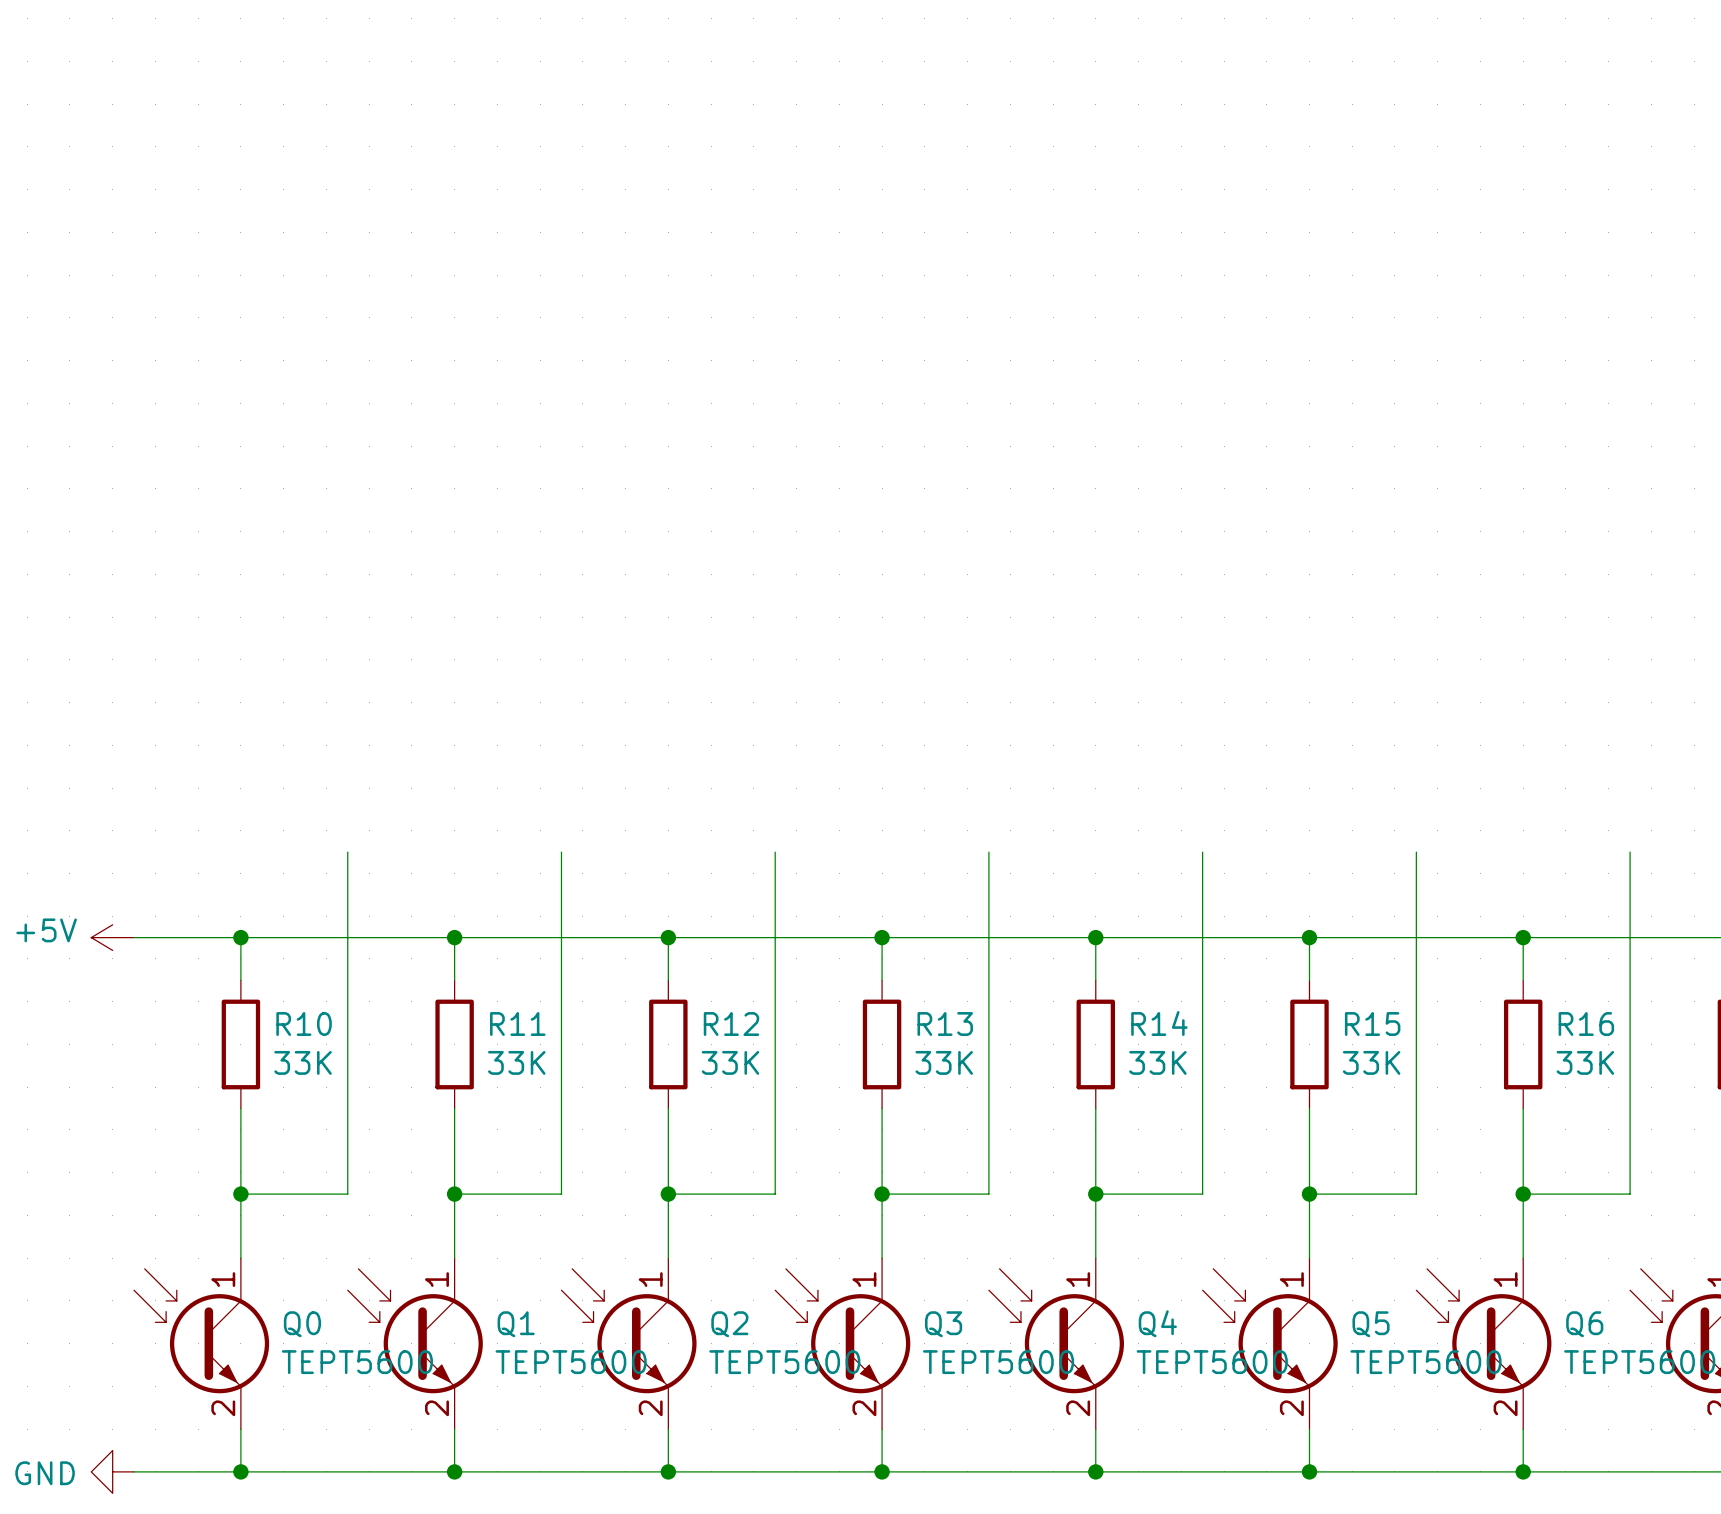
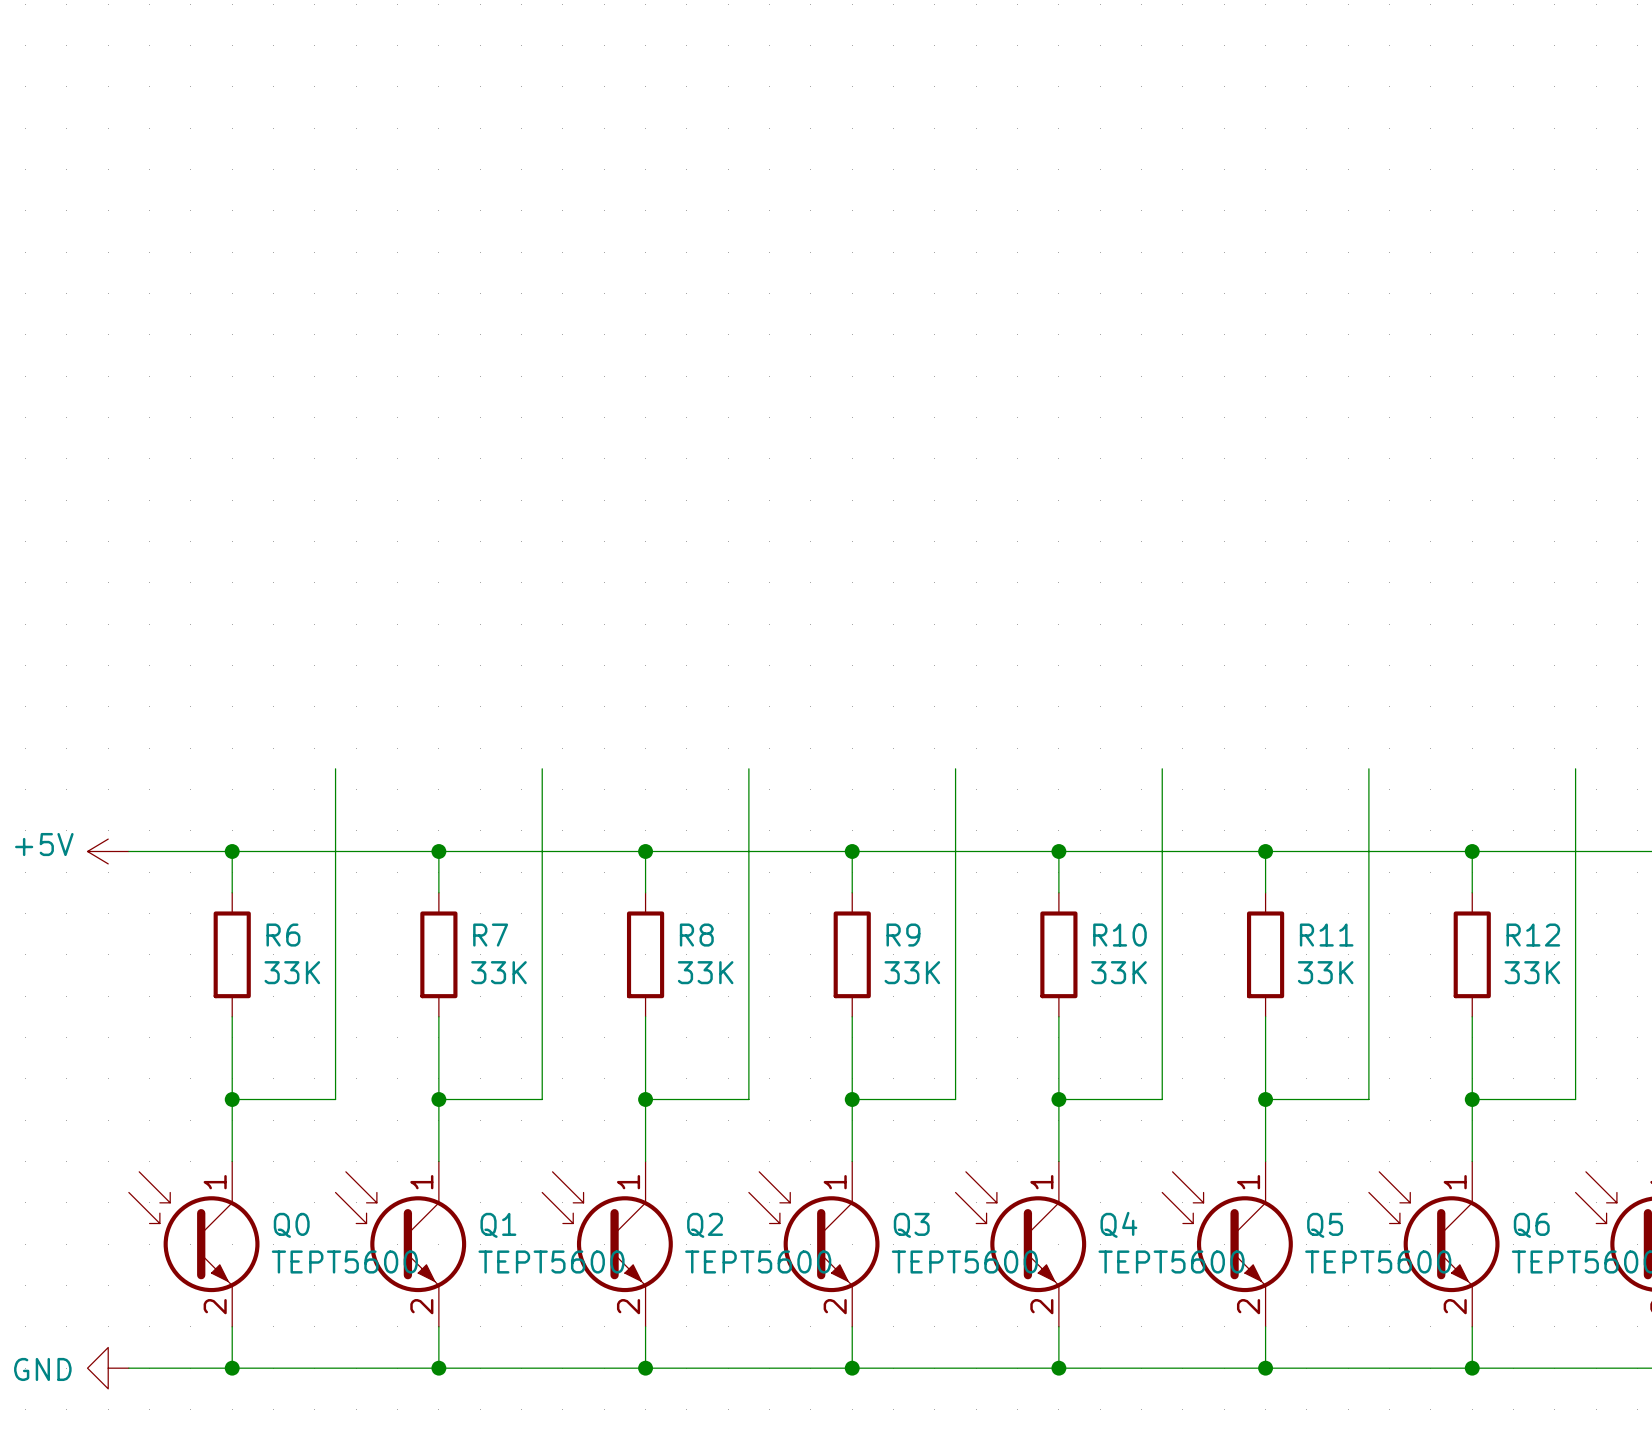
R14 name: R14 (1159, 1023) -> R10 (1119, 935)
R10 name: R10 (304, 1024) -> R6 (283, 935)
R11 name: R11 (517, 1024) -> R7 (490, 935)
R12 name: R12 (731, 1024) -> R8 (696, 935)
R13 name: R13 (945, 1024) -> R9 (903, 935)
R15 name: R15 (1372, 1024) -> R11 (1326, 935)
R16 name: R16 (1586, 1024) -> R12 (1533, 935)

